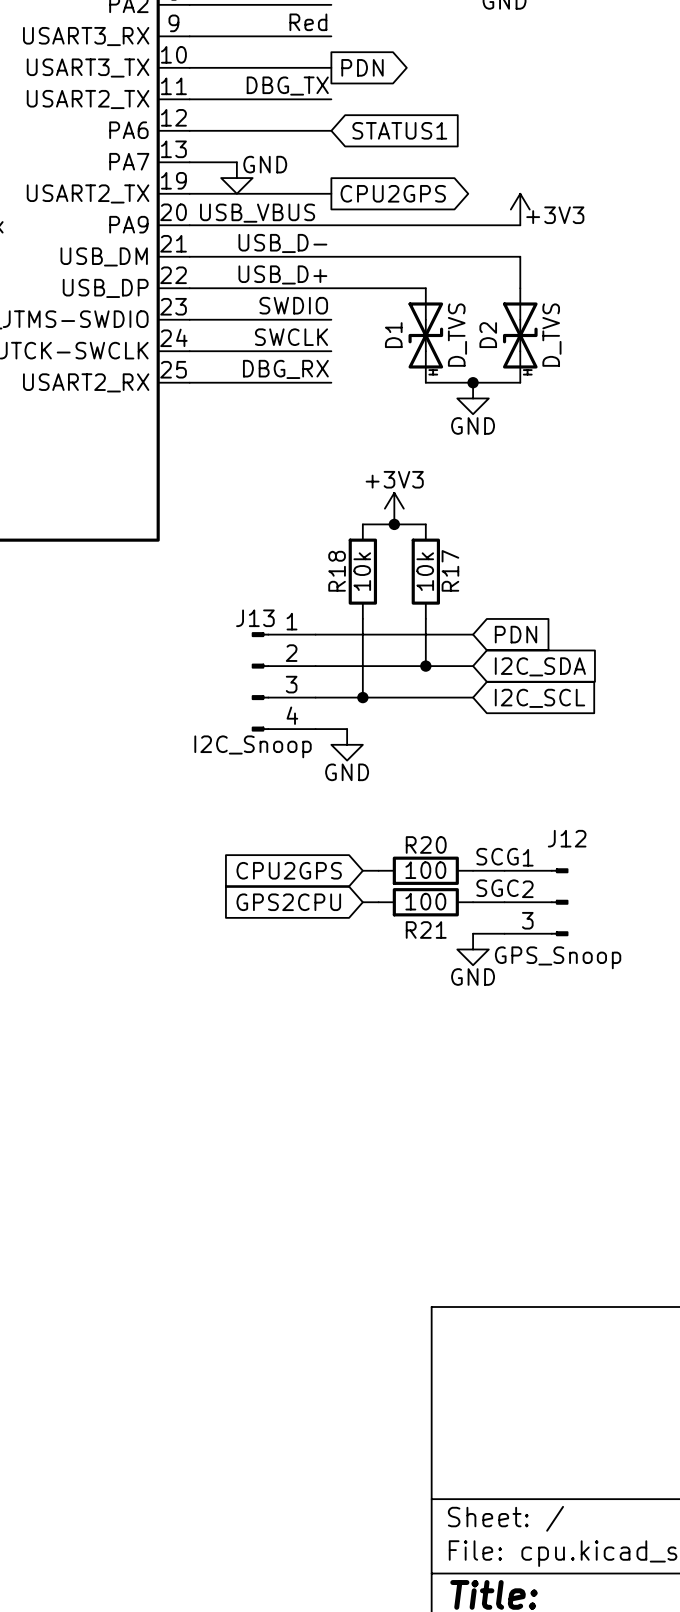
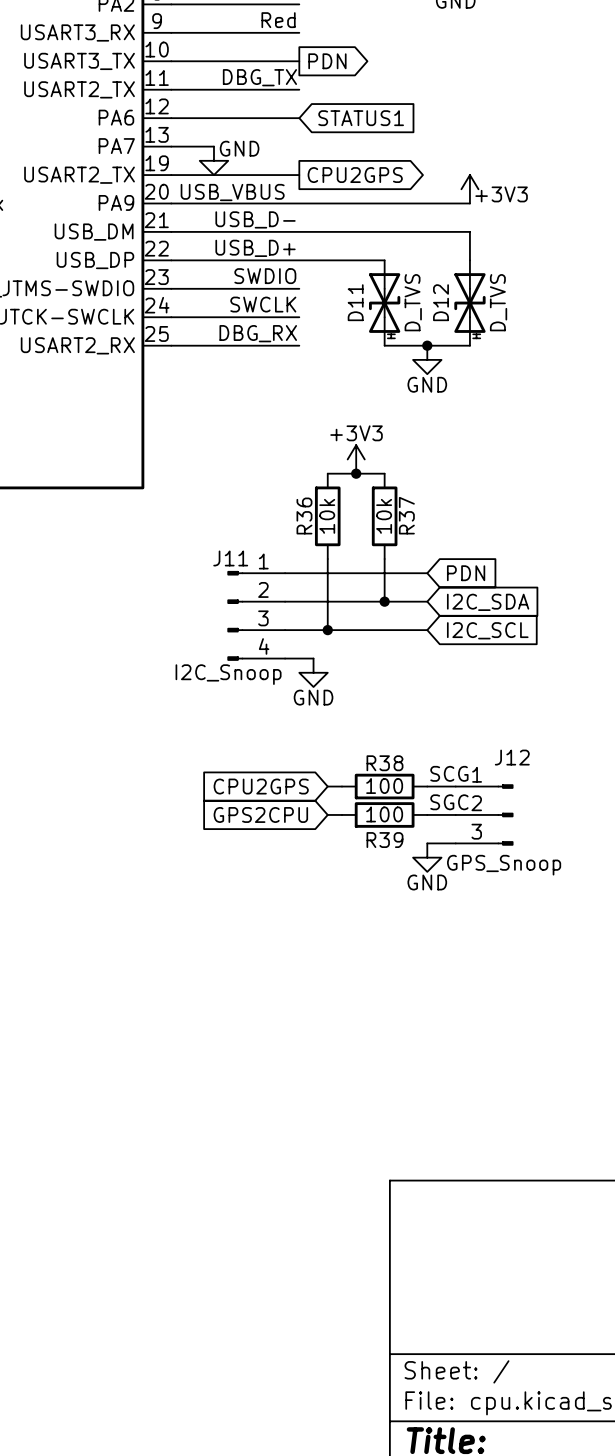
D1 name: D1 (393, 335) -> D11 (355, 302)
D2 name: D2 (488, 335) -> D12 (440, 302)
R17 name: R17 (450, 570) -> R37 (406, 515)
R18 name: R18 (337, 571) -> R36 (304, 516)
J13 name: J13 (255, 618) -> J11 (230, 558)
R20 name: R20 (426, 844) -> R38 (384, 763)
R21 name: R21 (426, 930) -> R39 (384, 840)

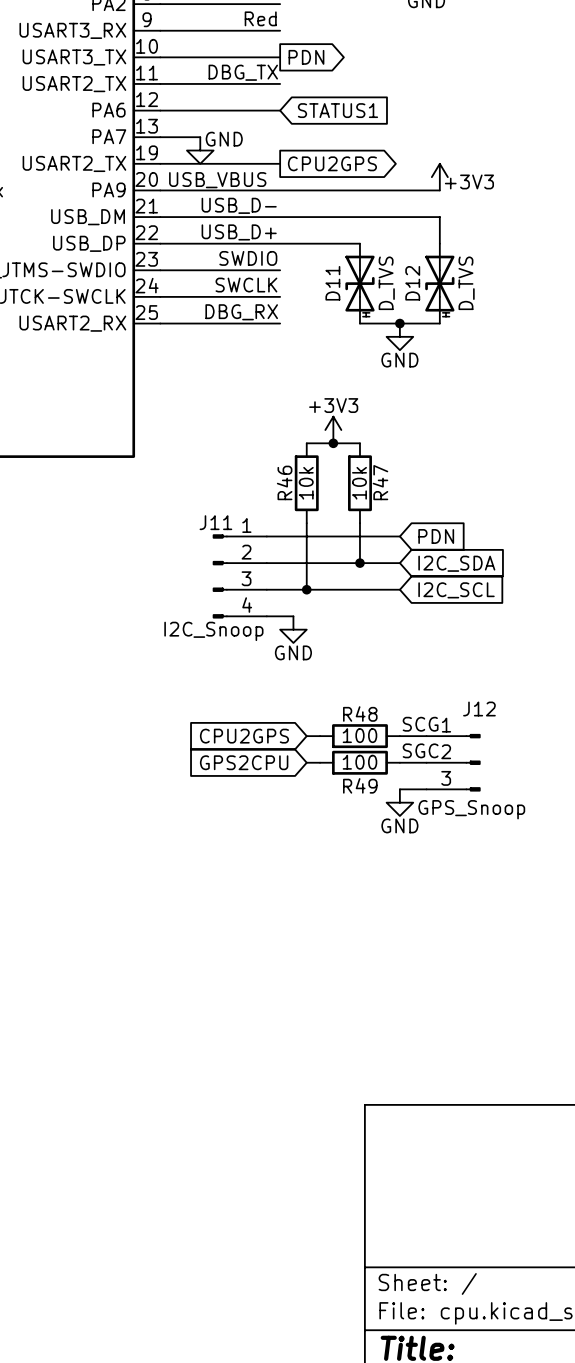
R37 name: R37 (406, 515) -> R47 (380, 482)
R36 name: R36 (304, 516) -> R46 (284, 482)
R38 name: R38 (384, 763) -> R48 (360, 714)
R39 name: R39 (384, 840) -> R49 (360, 785)

